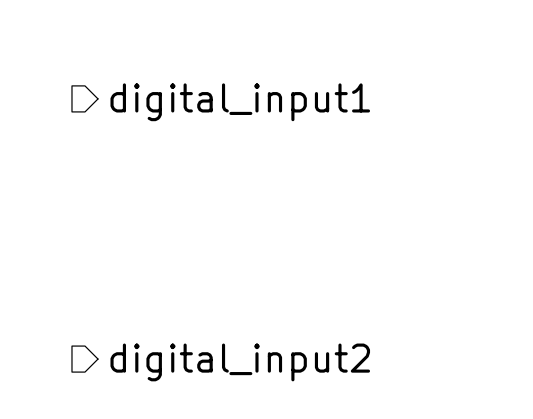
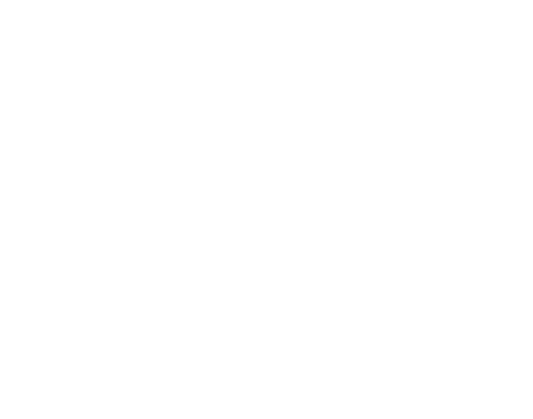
hierarchical label: digital_input1 (240, 102) -> none
hierarchical label: digital_input2 (240, 362) -> none

